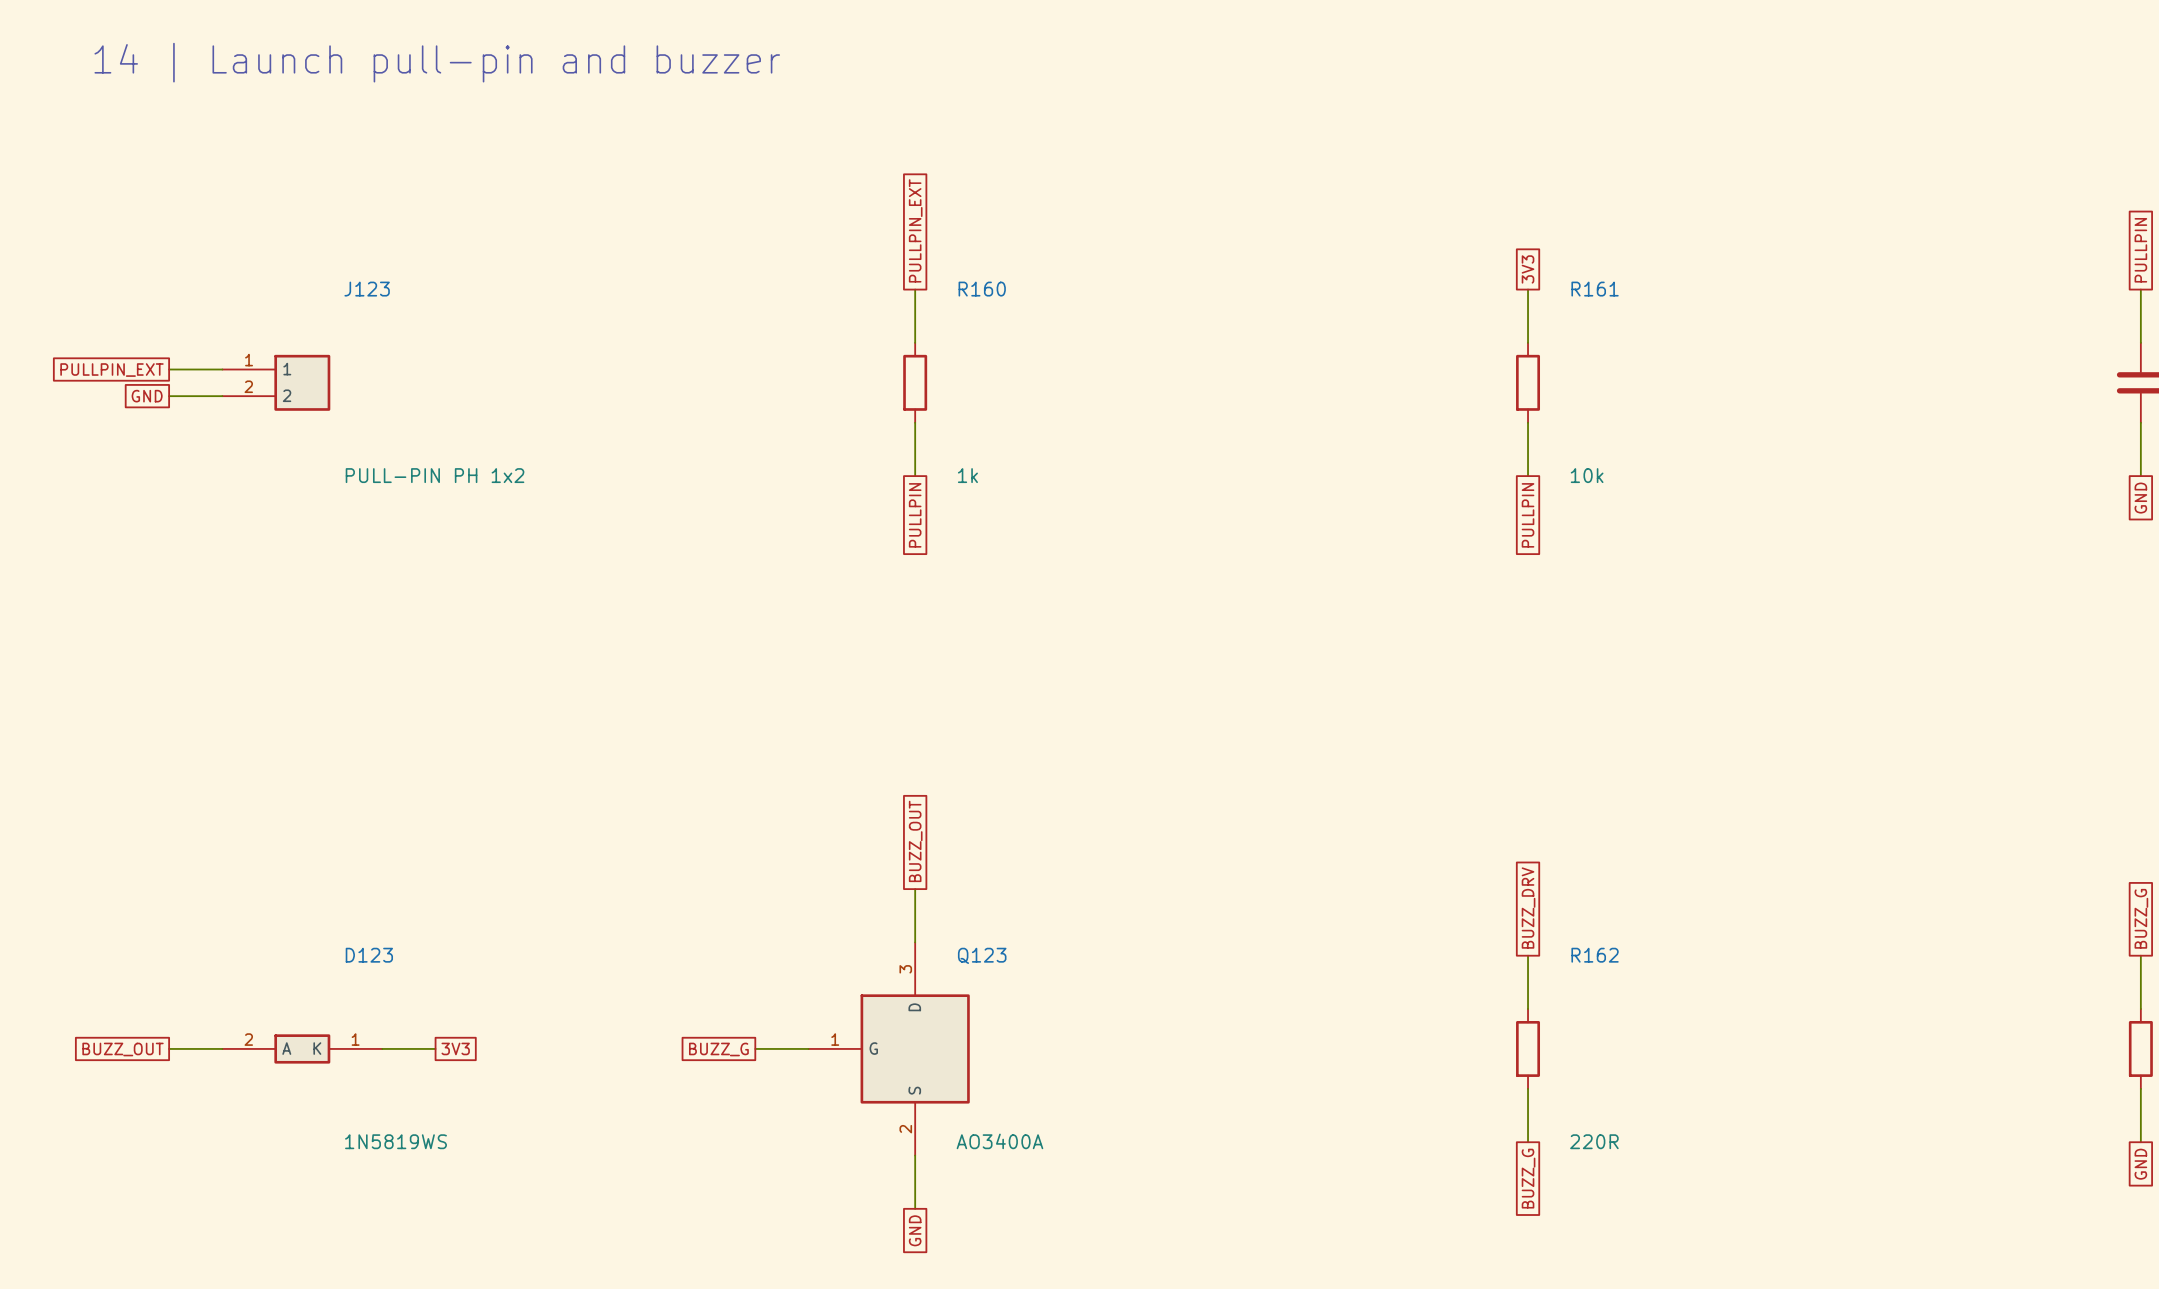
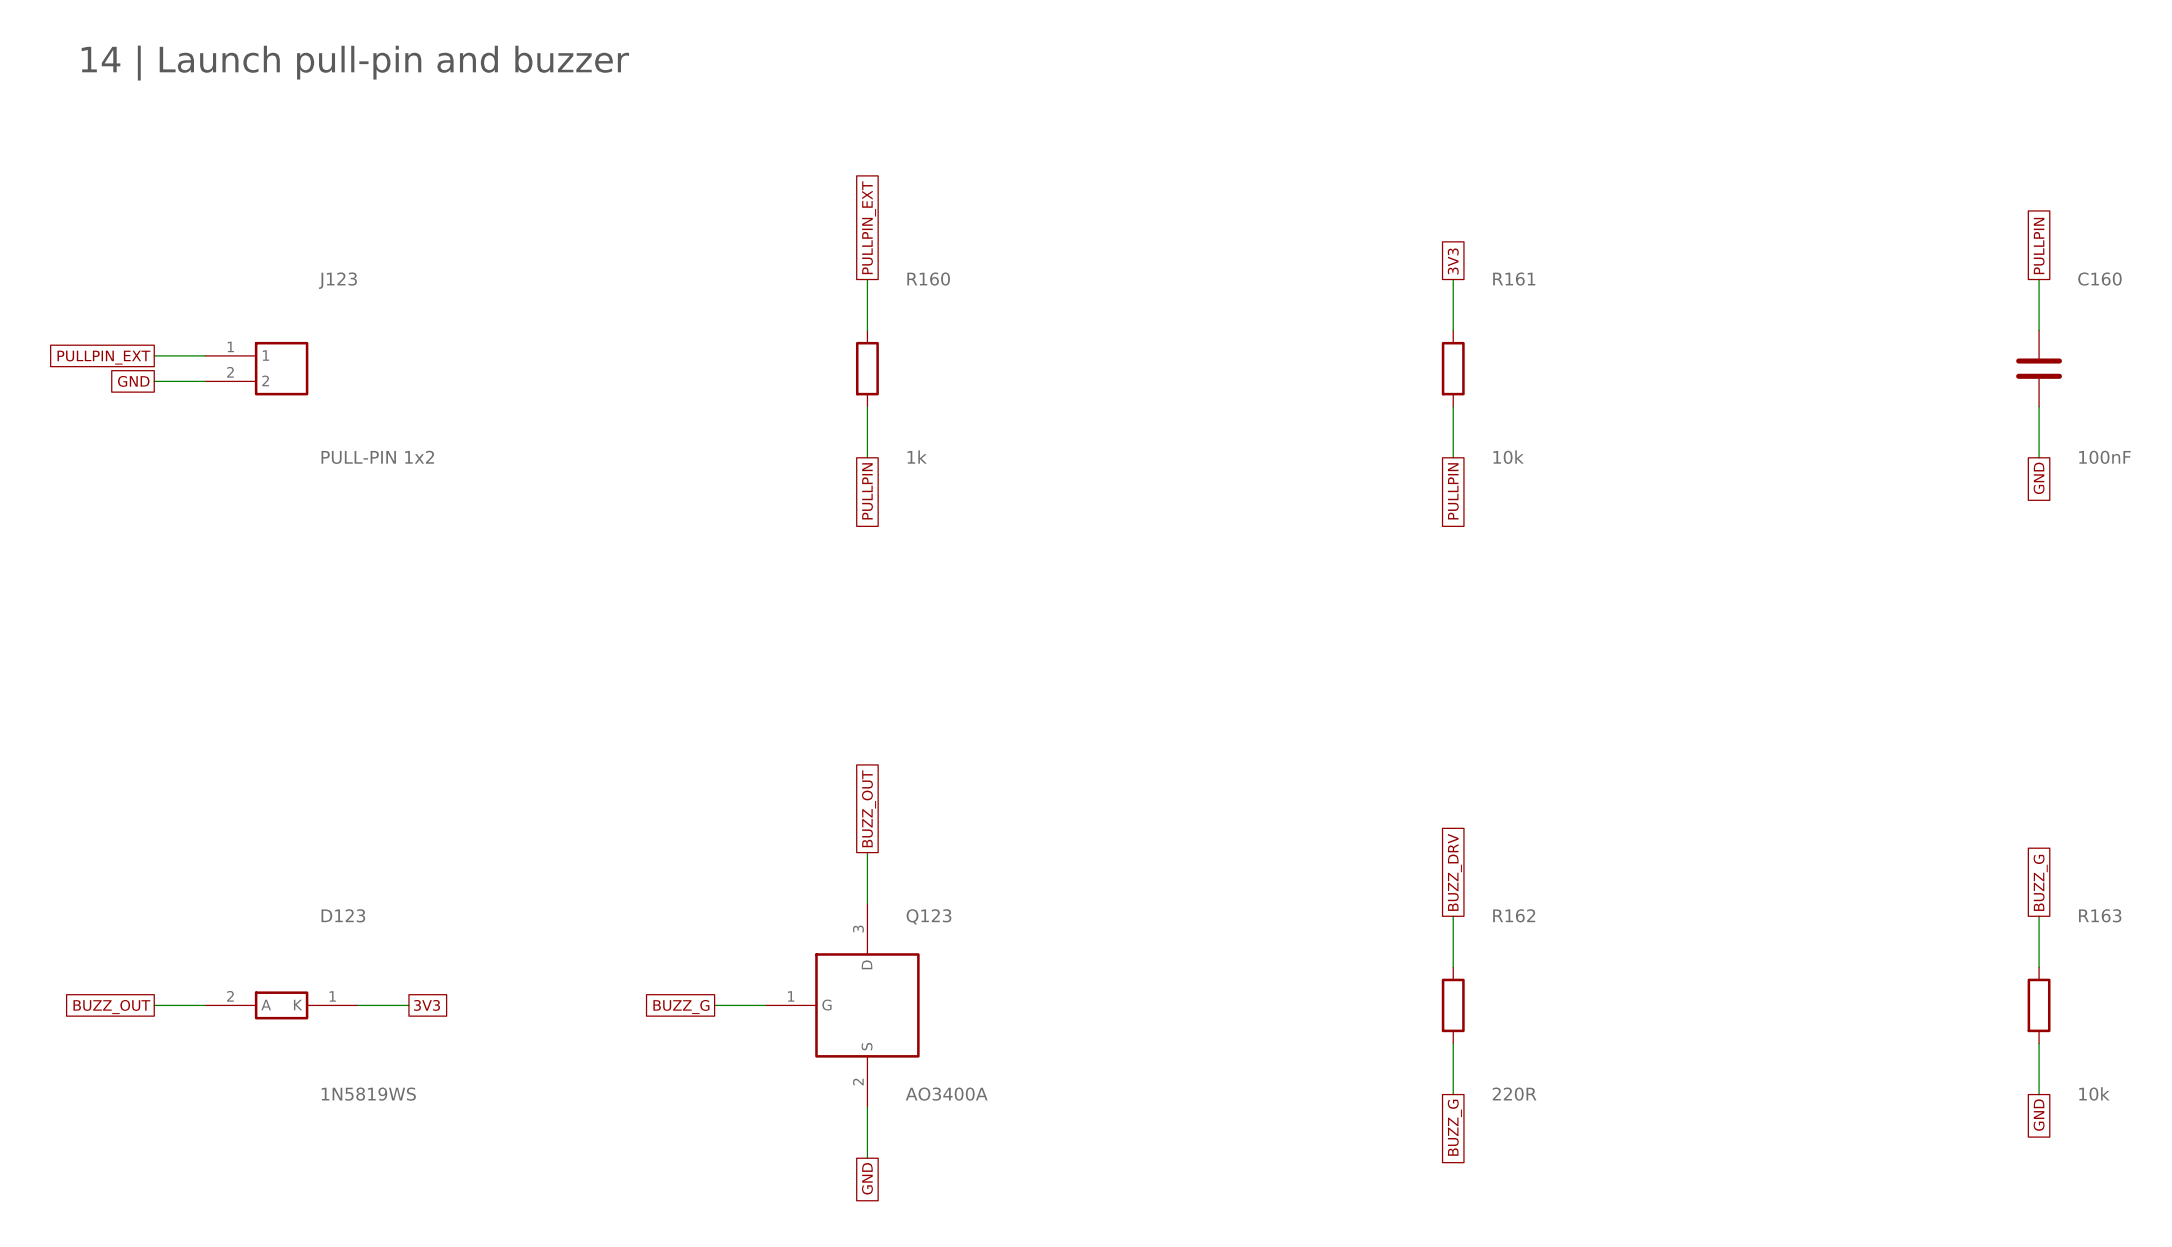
J123 value: PULL-PIN PH 1x2 (435, 475) -> PULL-PIN 1x2 (377, 457)

